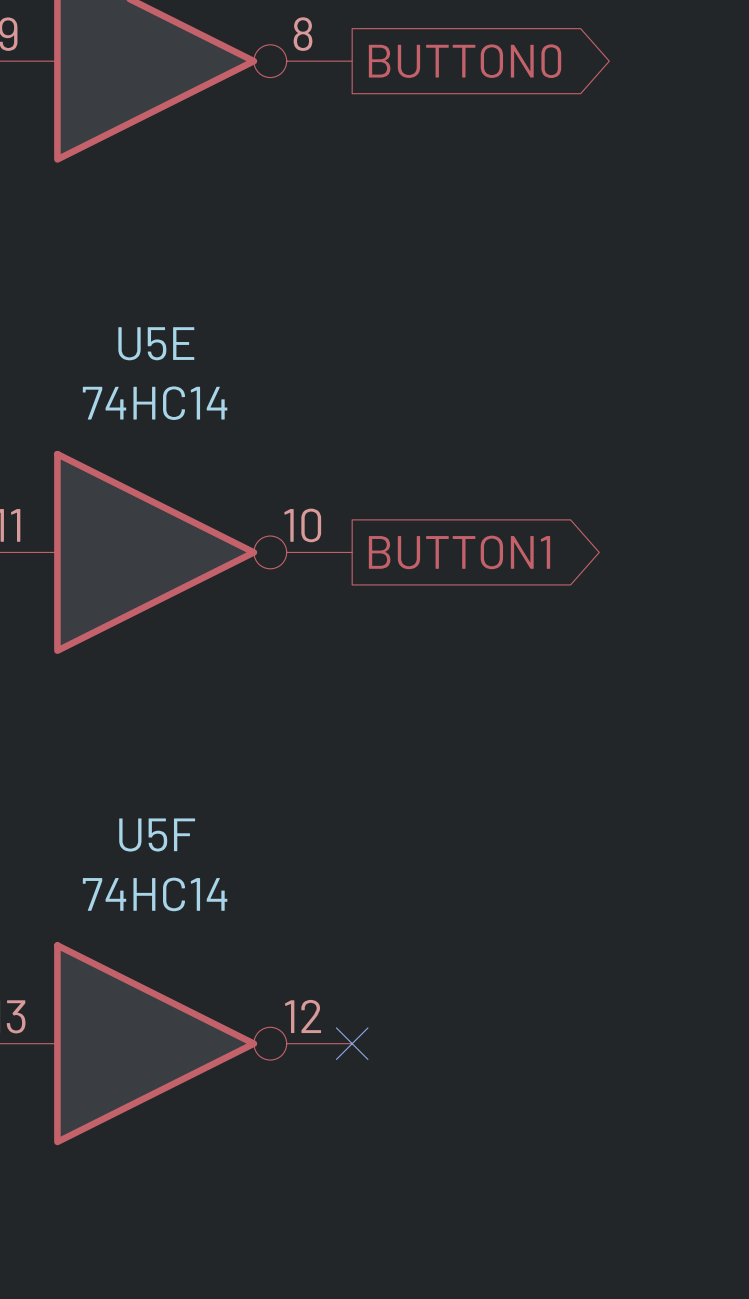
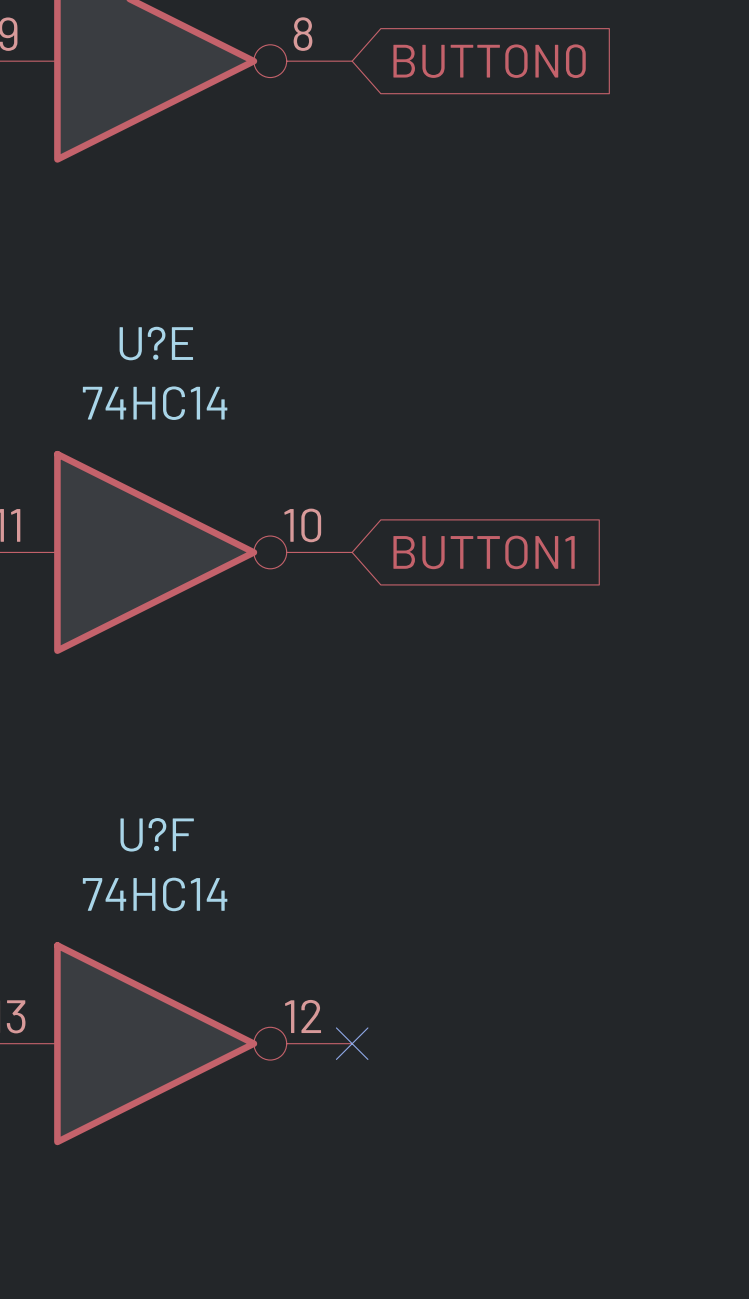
global label shape: output (465, 61) -> input (489, 61)
U5E name: U5E (156, 343) -> U?E (156, 343)
global label shape: output (459, 552) -> input (484, 552)
U5F name: U5F (157, 835) -> U?F (157, 834)

